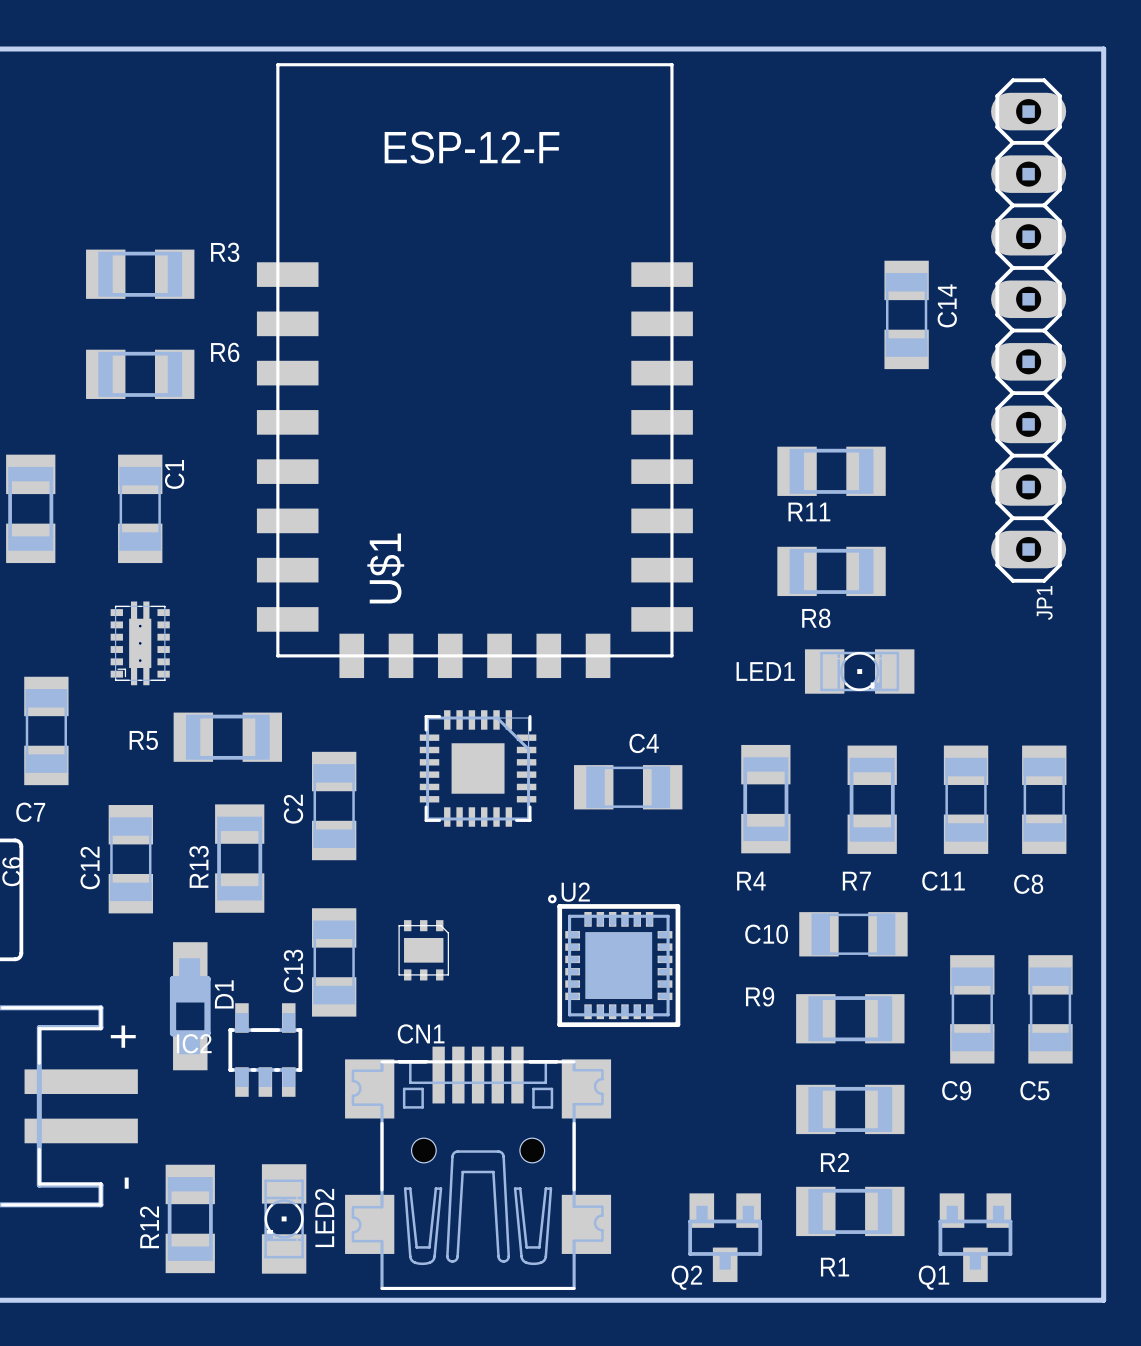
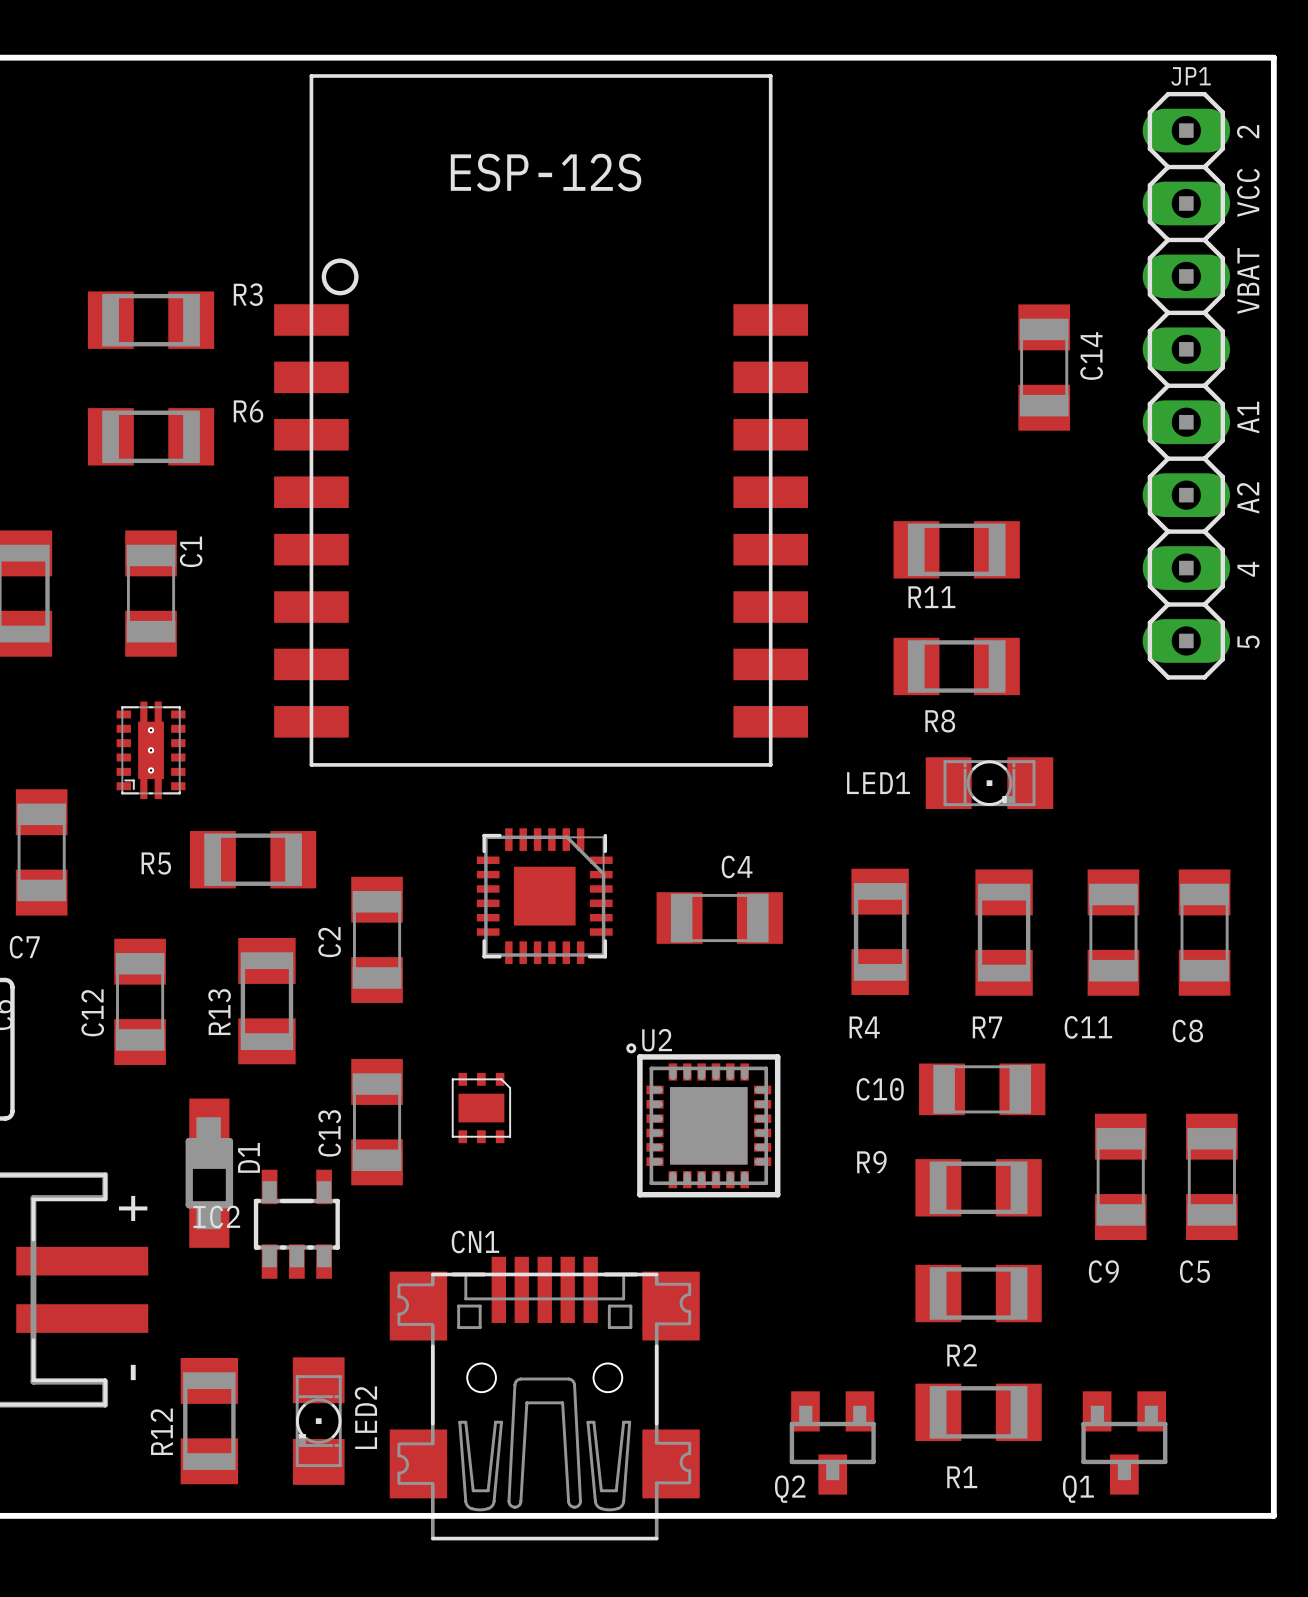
text: none -> 2 (1248, 131)
text: none -> VCC (1248, 192)
text: none -> VBAT (1248, 280)
text: none -> A1 (1248, 417)
part: none -> (541, 420)
U$1: (474, 370) -> none
text: none -> A2 (1248, 497)
text: none -> 4 (1248, 569)
text: none -> 5 (1248, 642)
JP1 name rotation: 0° (1044, 602) -> 90° clockwise (1191, 76)
JP1 name position: JP1 (1044, 602) -> JP1 (1191, 76)
CN1 position: (478, 1168) -> (544, 1398)

